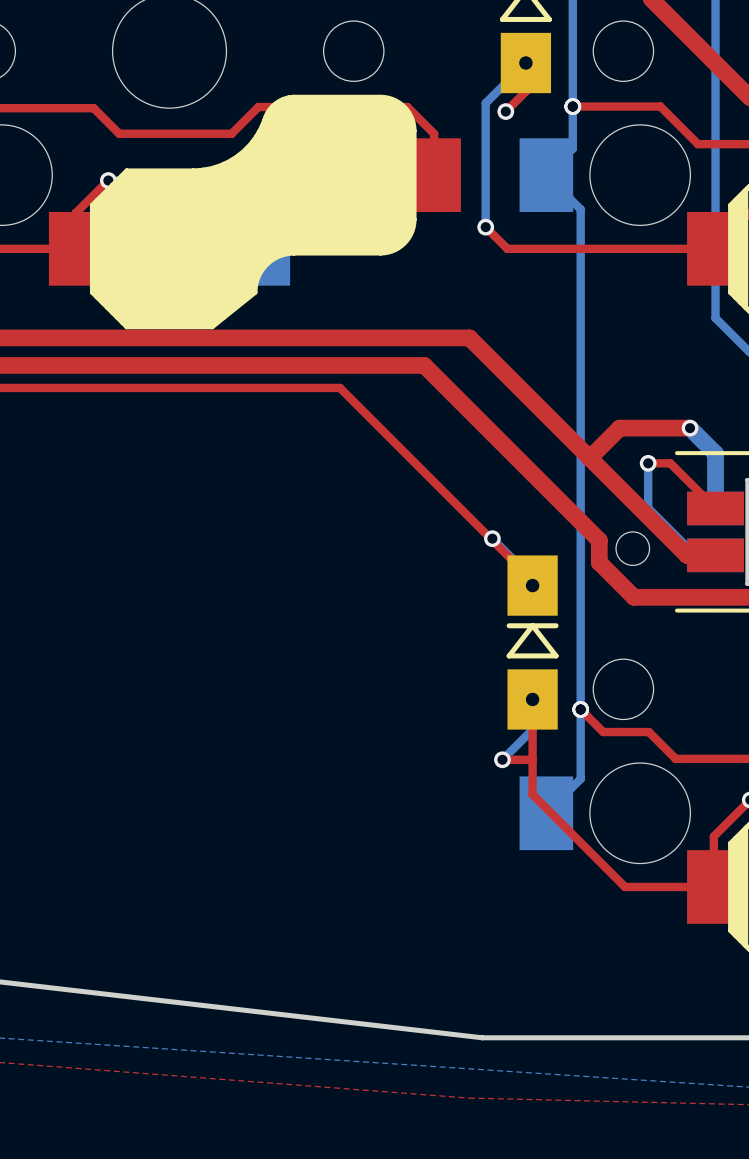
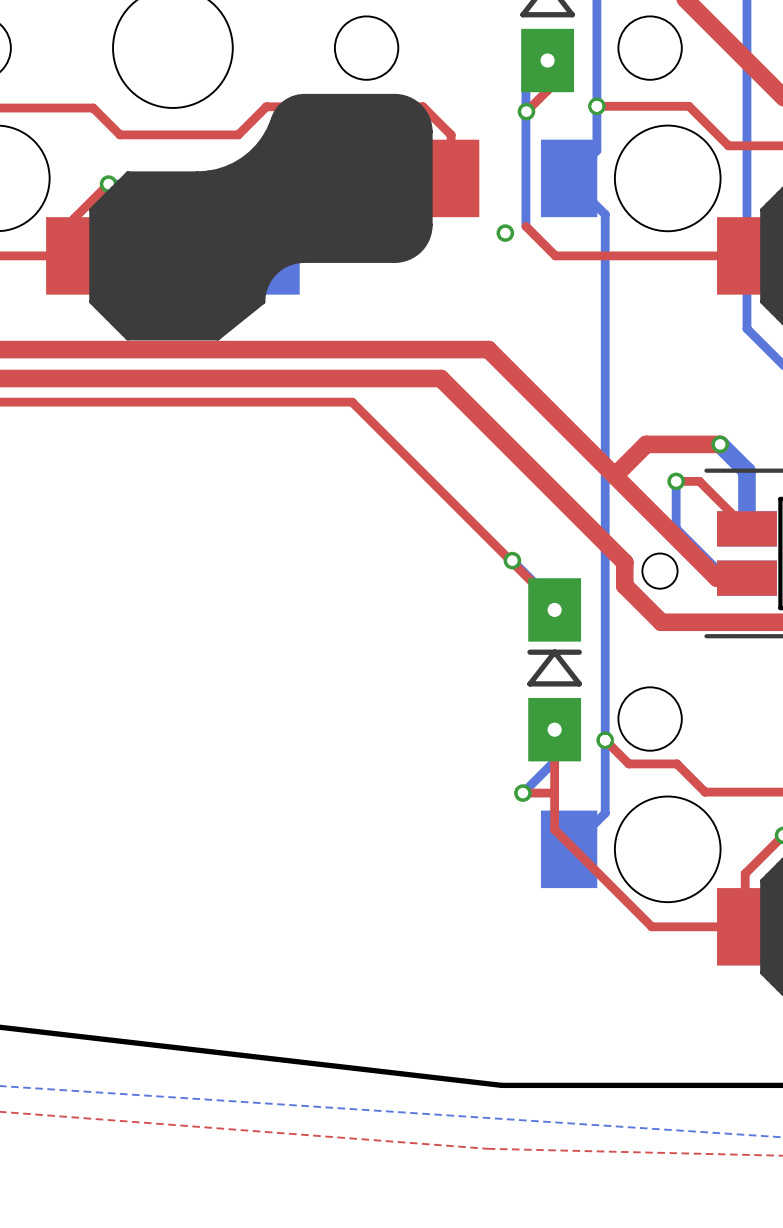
bottom track: (505, 83) (485, 103) (485, 227) -> (525, 82) (525, 226)
via: none -> (596, 106)
top track: (485, 227) (507, 248) (533, 248) -> (525, 226) (555, 255)
via: none -> (605, 740)

